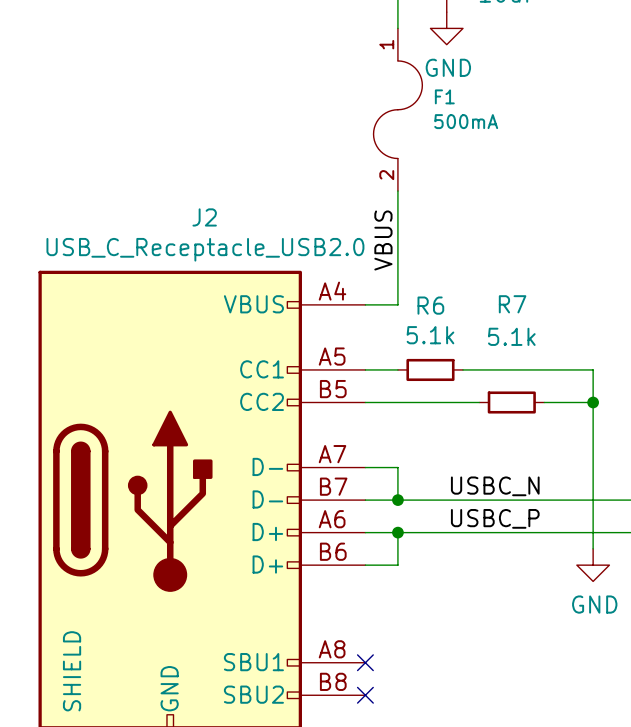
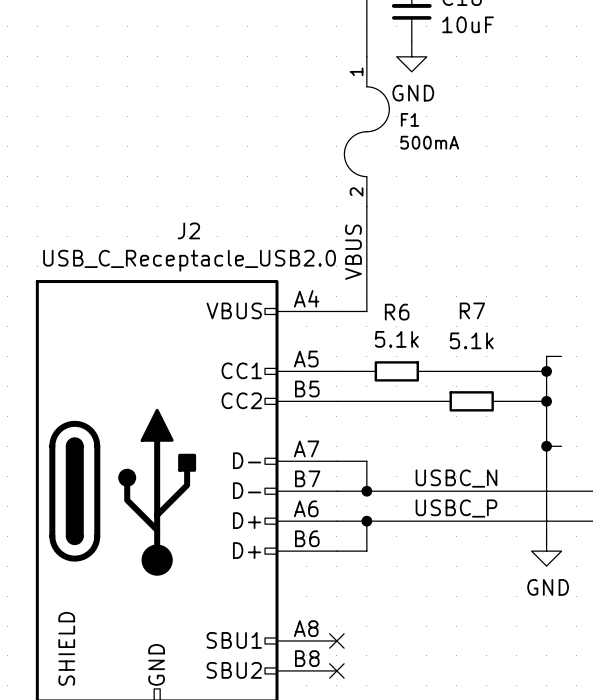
wire: none -> (561, 356) (546, 356) (546, 371)
junction: none -> (546, 371)
wire: none -> (546, 446) (561, 446)
junction: none -> (546, 446)

